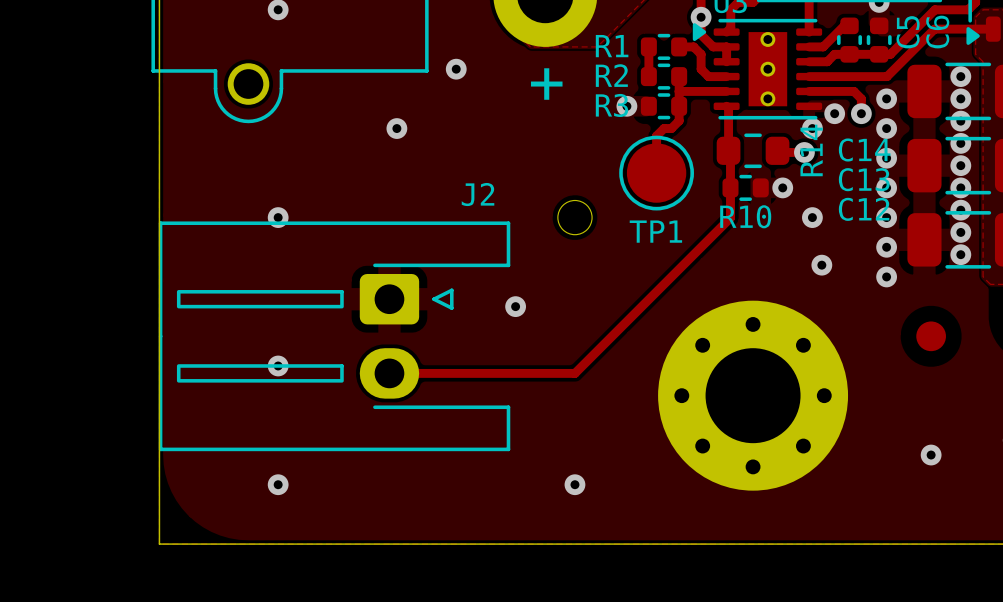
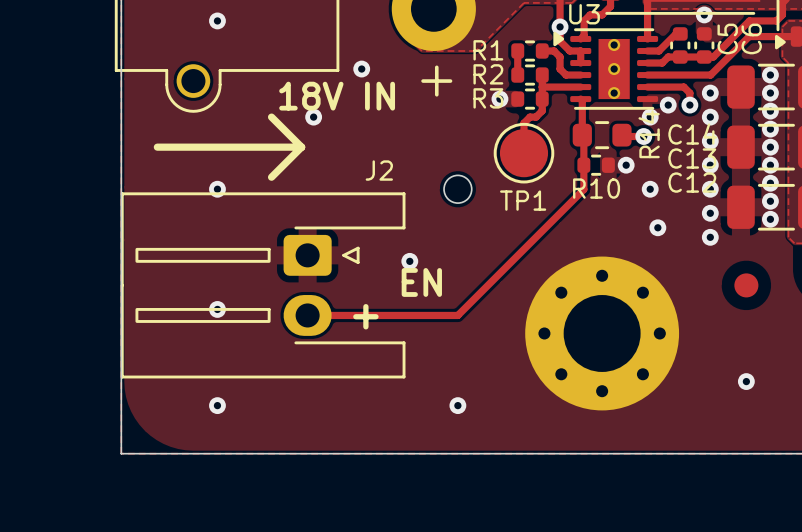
text: none -> 18V IN (337, 96)
line: none -> (271, 117) (301, 147)
line: none -> (157, 147) (301, 147)
line: none -> (301, 147) (271, 177)
text: none -> EN (421, 282)
text: none -> + (365, 316)

